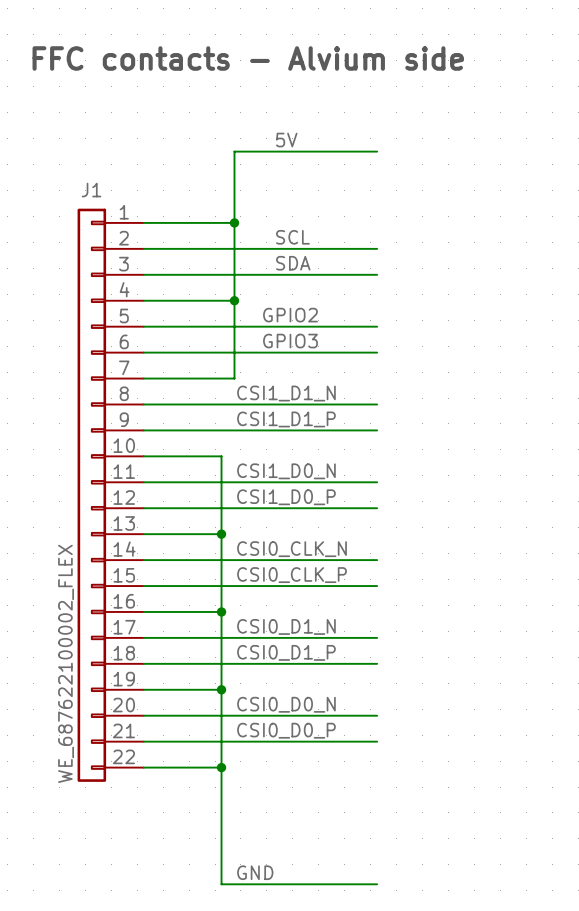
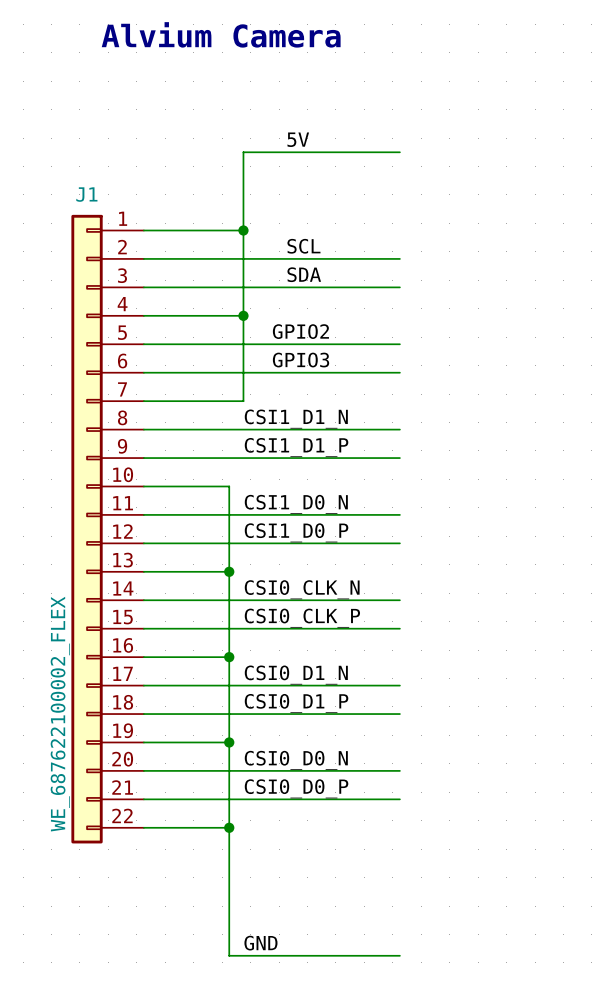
text: none -> Alvium Camera (221, 34)
text: FFC contacts - Alvium side (248, 58) -> none

